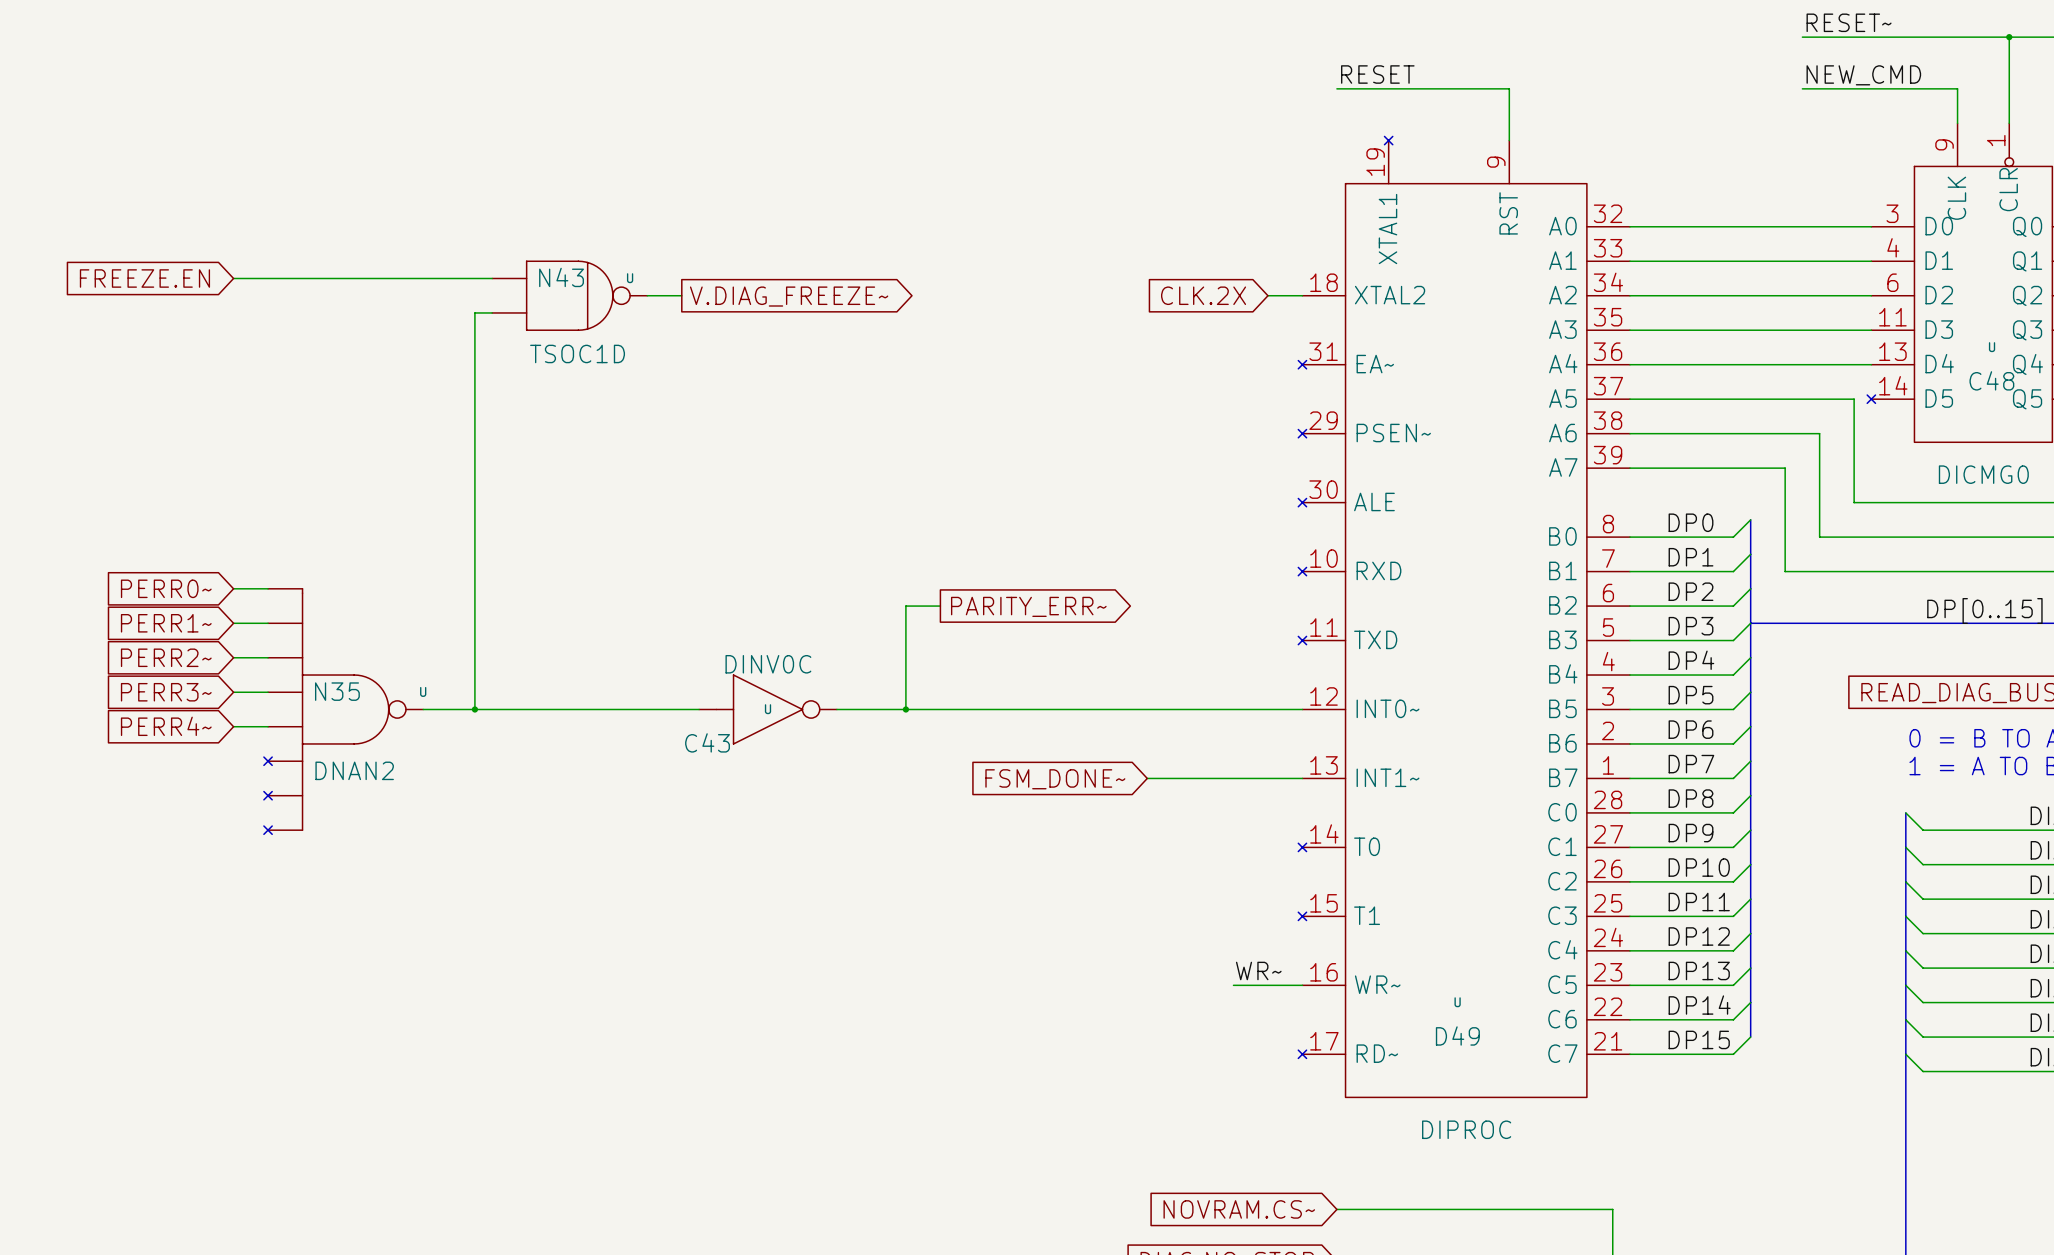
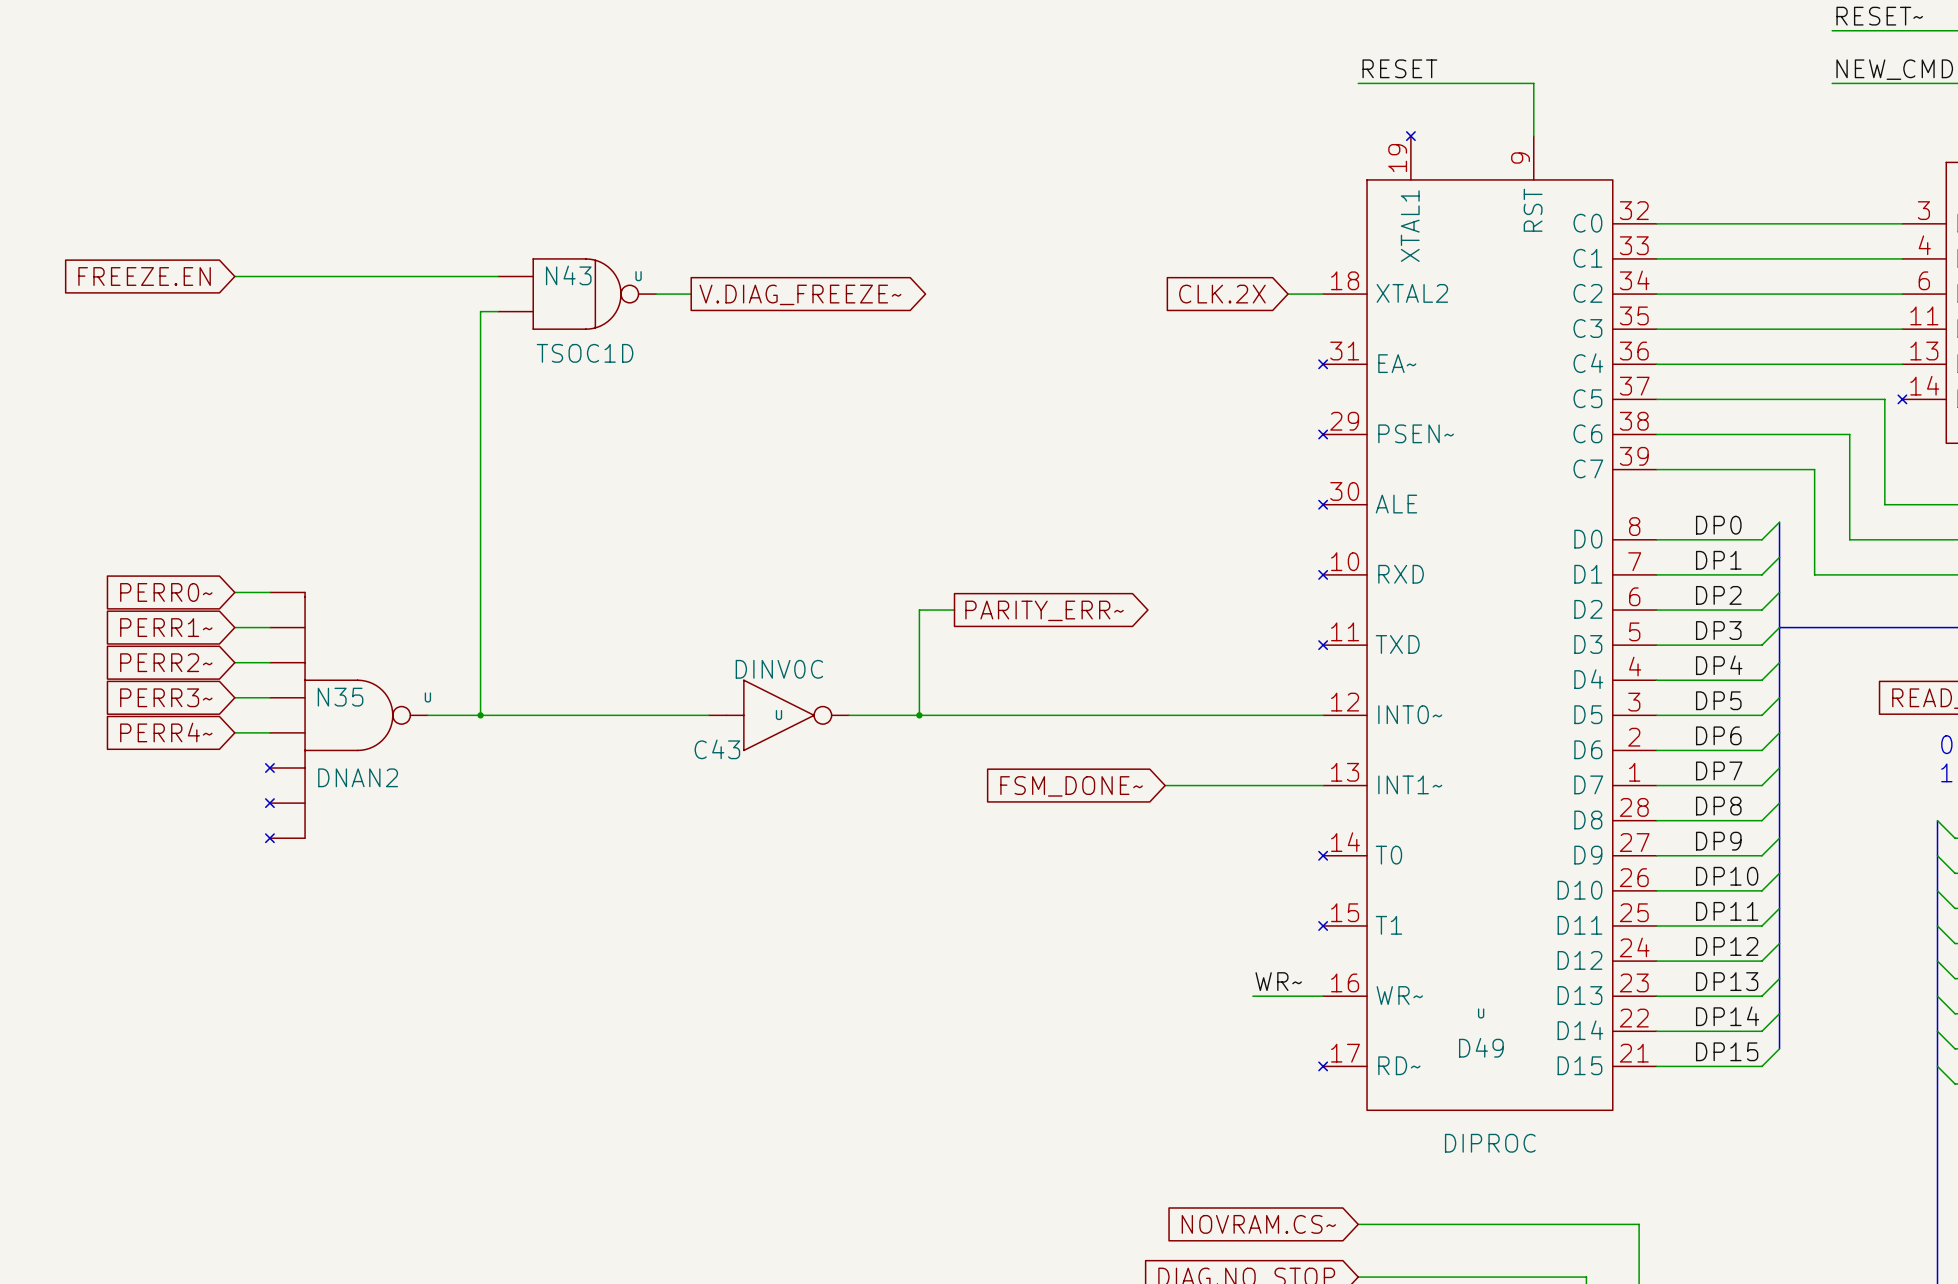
U symbol: [1302, 140, 1630, 1098] -> [1323, 136, 1657, 1111]

